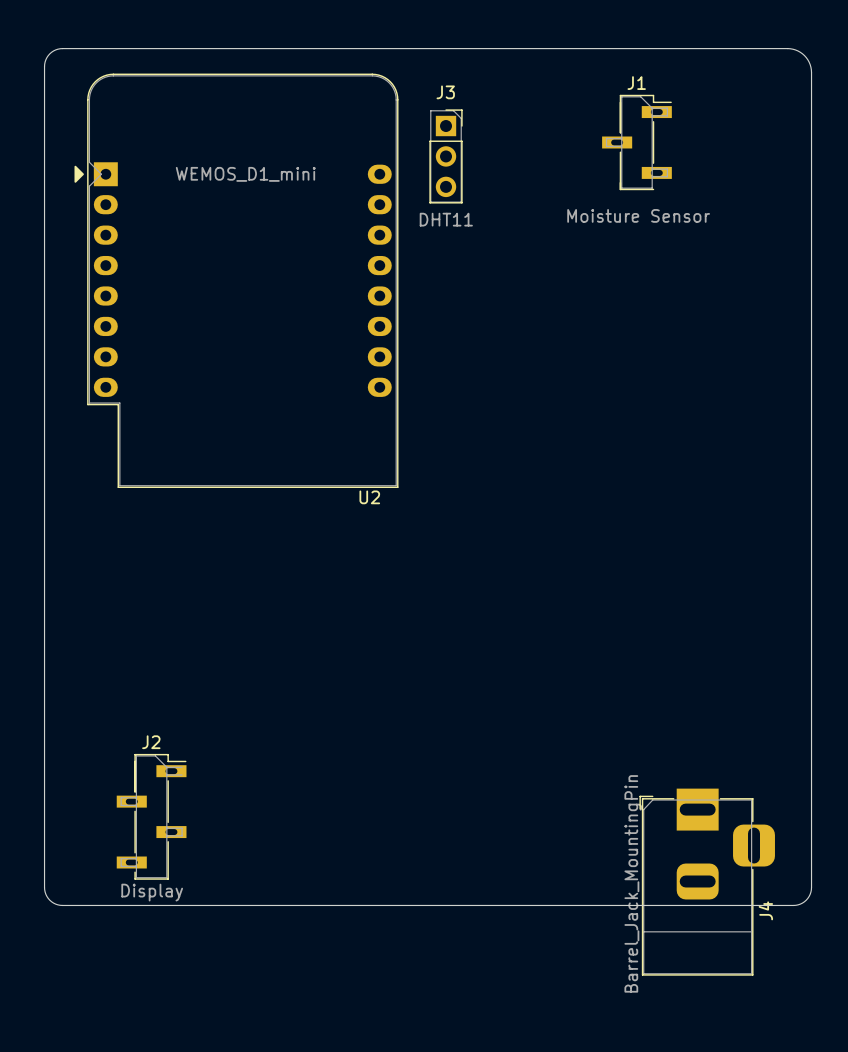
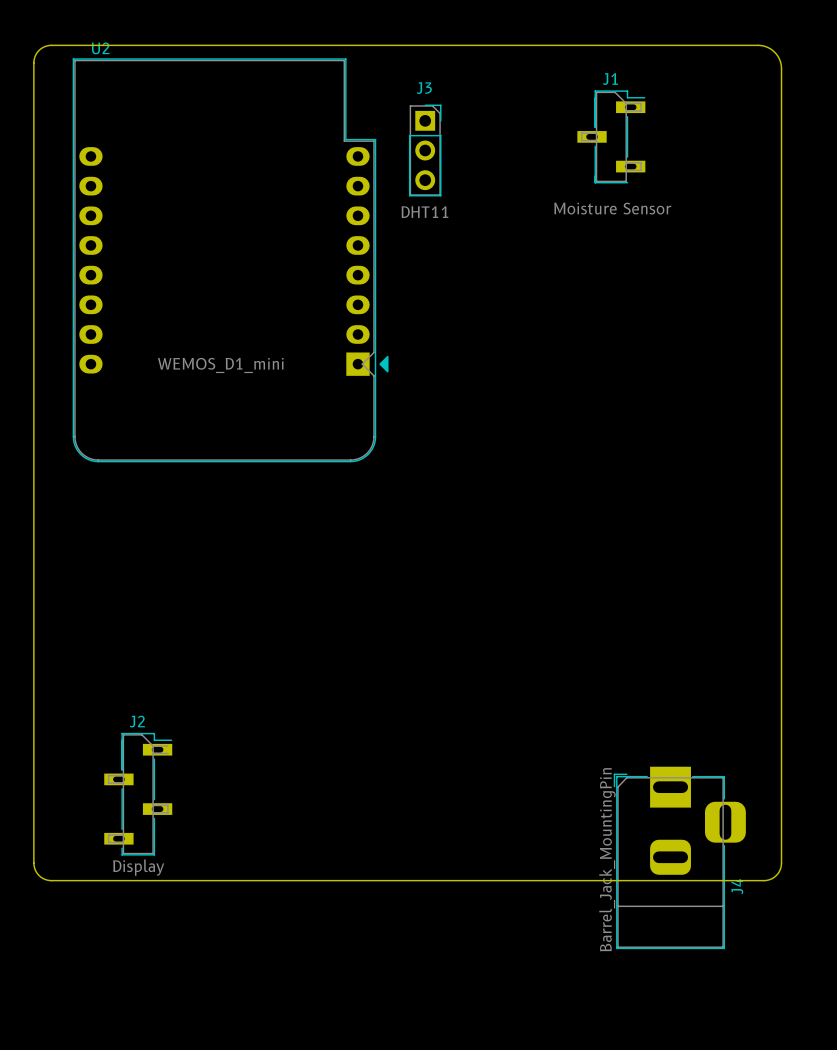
U2 rotation: 0° (236, 280) -> 180° (230, 260)

